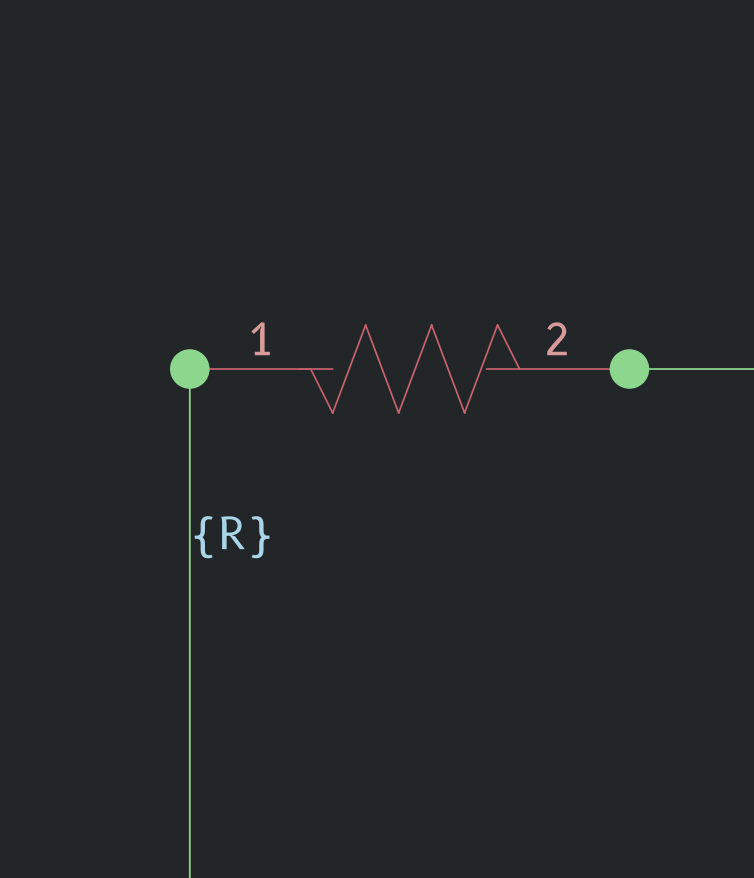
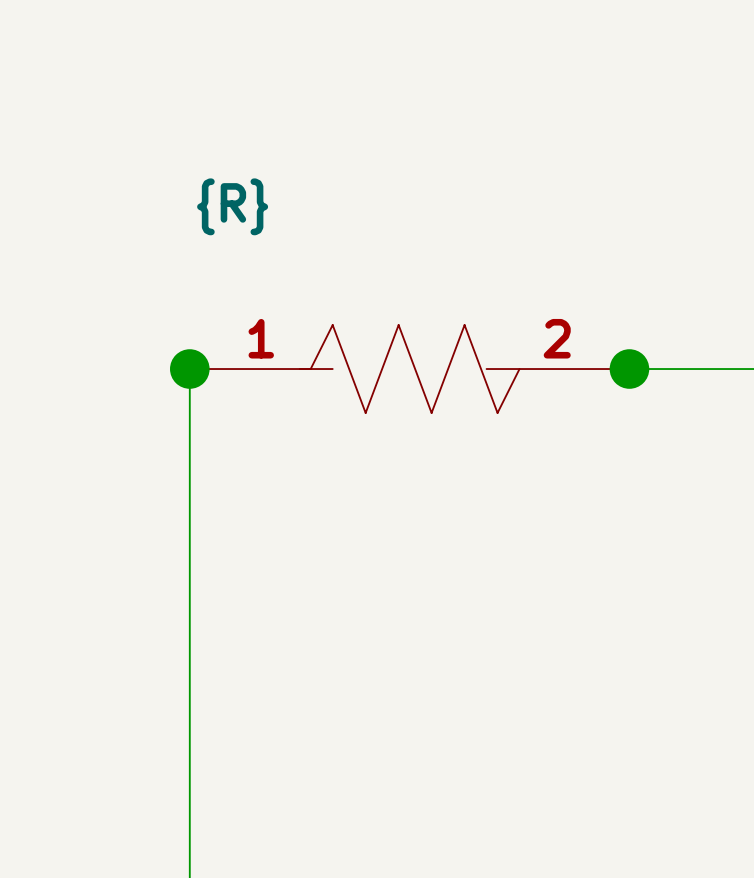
part flip: as is (409, 369) -> up-down (409, 369)

